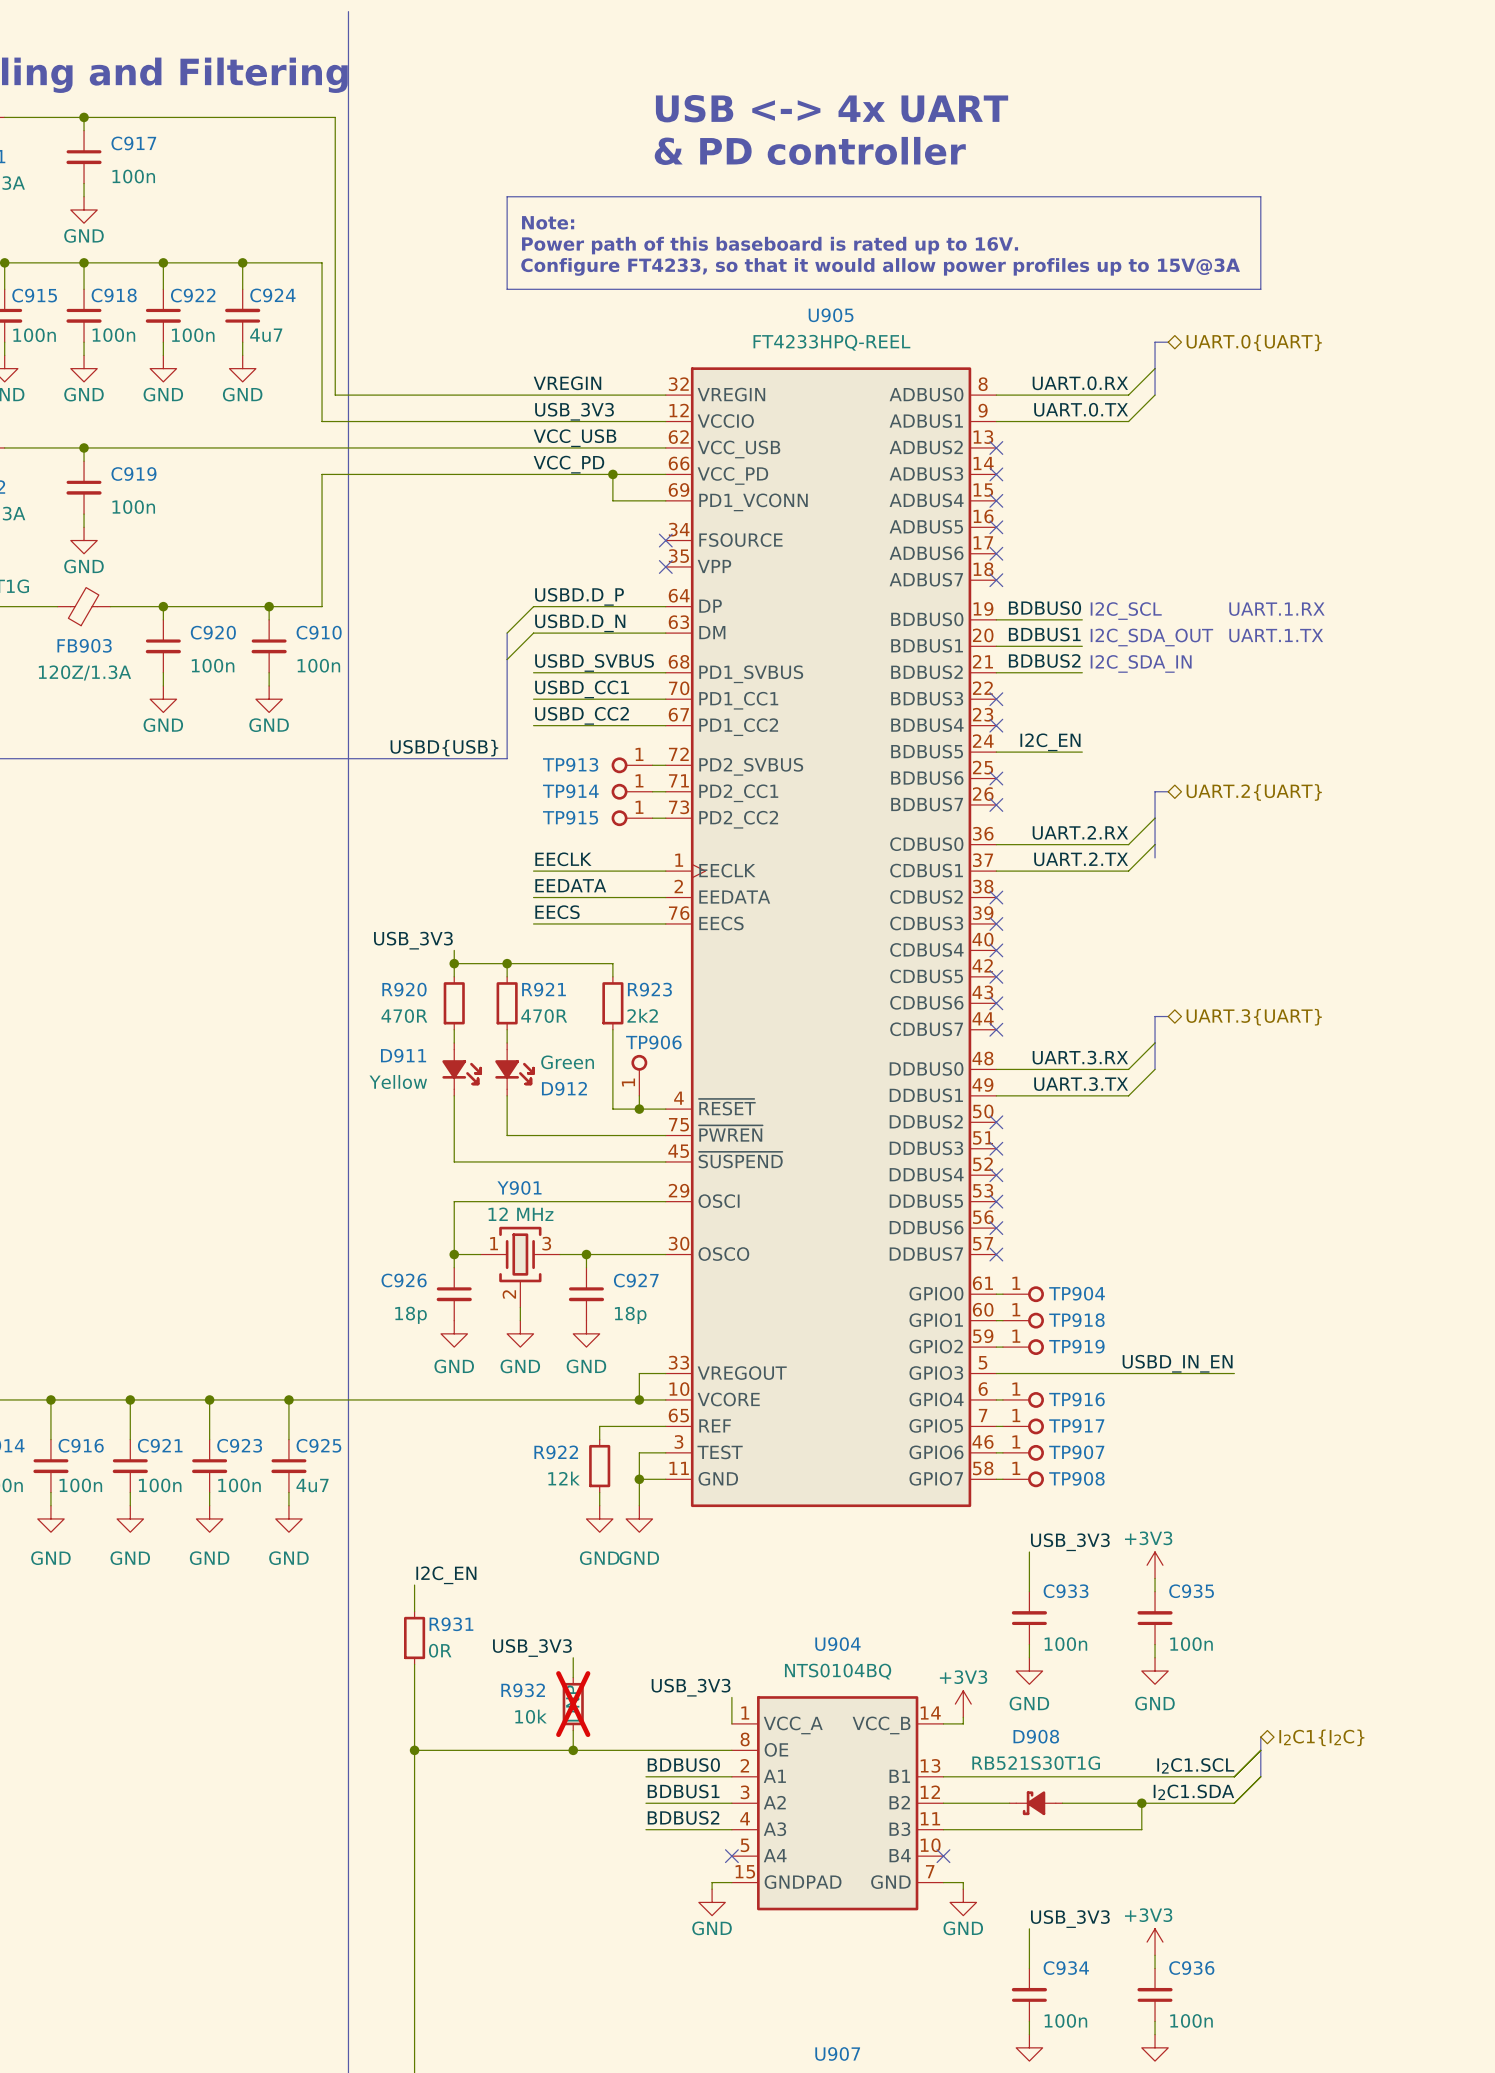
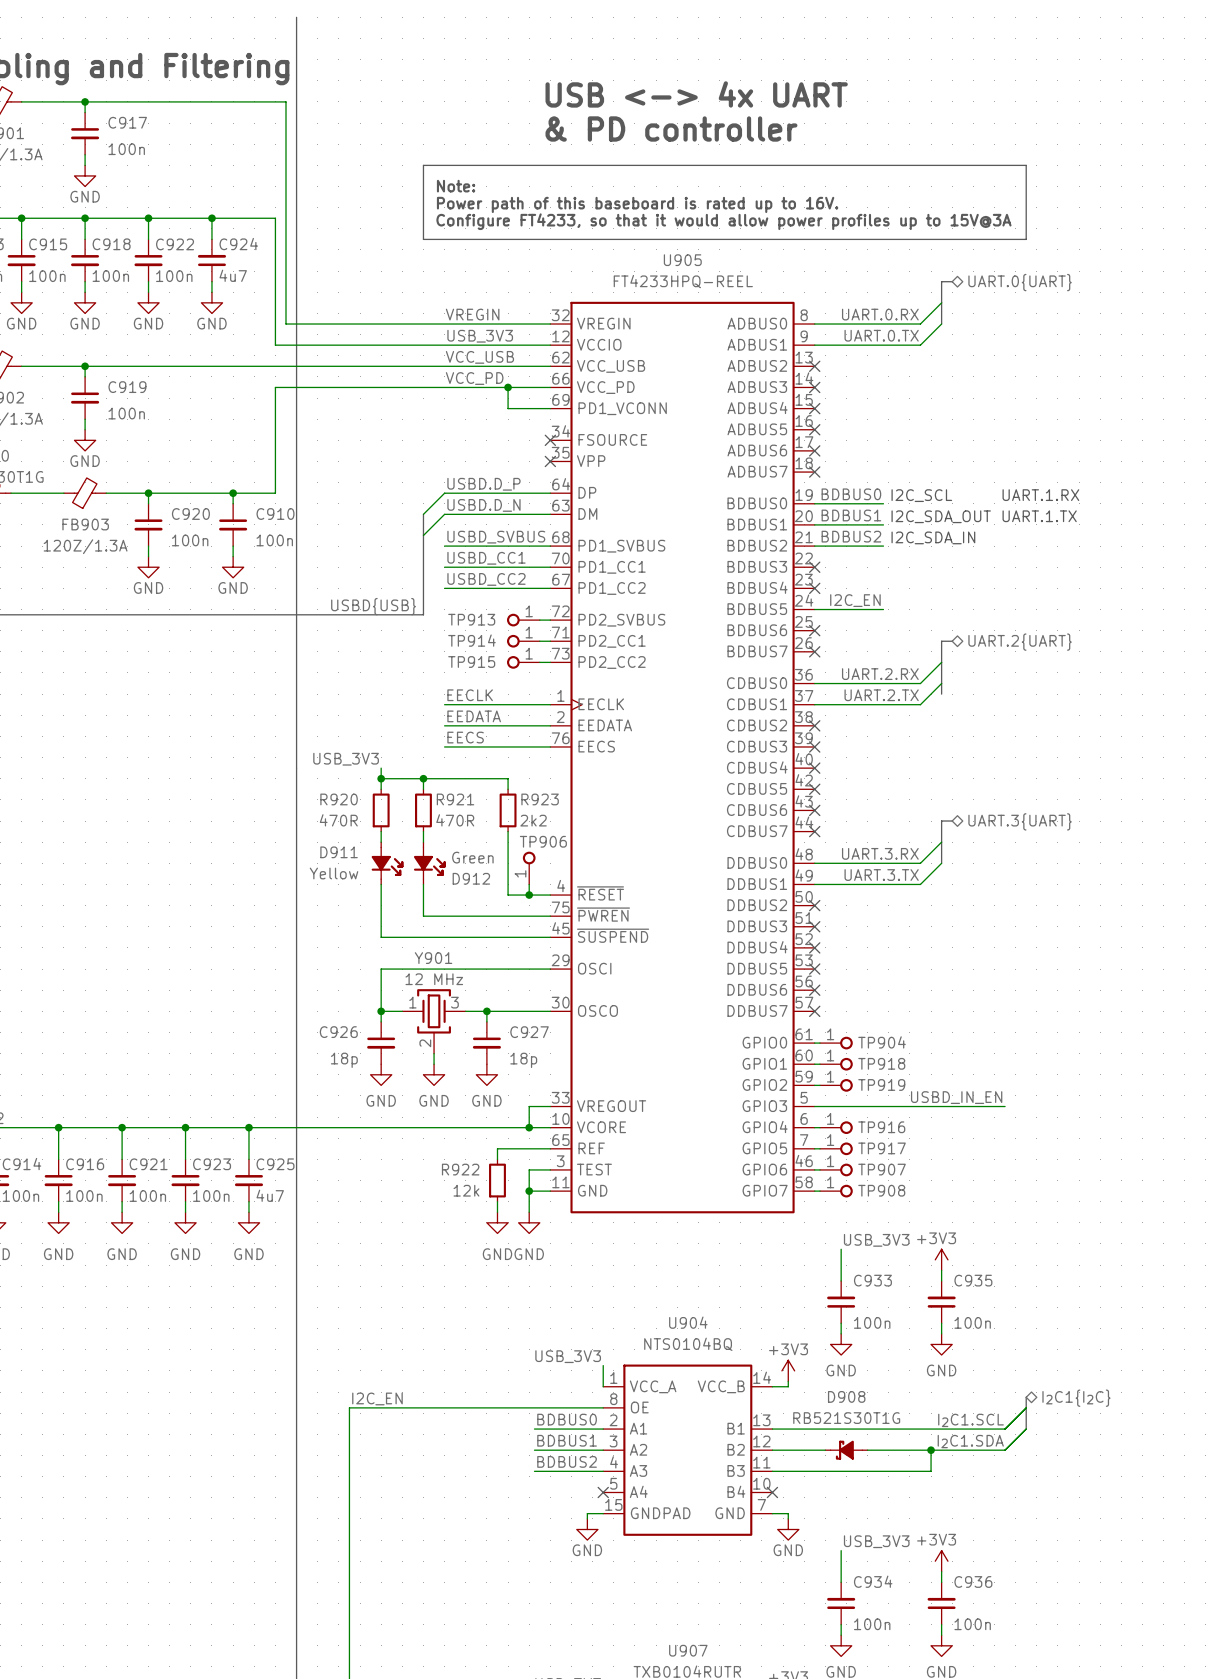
label position: I2C_EN (446, 1575) -> I2C_EN (377, 1398)
wire: (414, 1585) (414, 1611) -> none
R931: (414, 1637) -> none
label: USB_3V3 (532, 1648) -> none
wire: (573, 1657) (573, 1677) -> none
wire: (414, 1664) (414, 1750) -> none
R932: (573, 1704) -> none
wire: (573, 1730) (573, 1750) -> none
junction: (414, 1750) -> none
junction: (573, 1750) -> none

